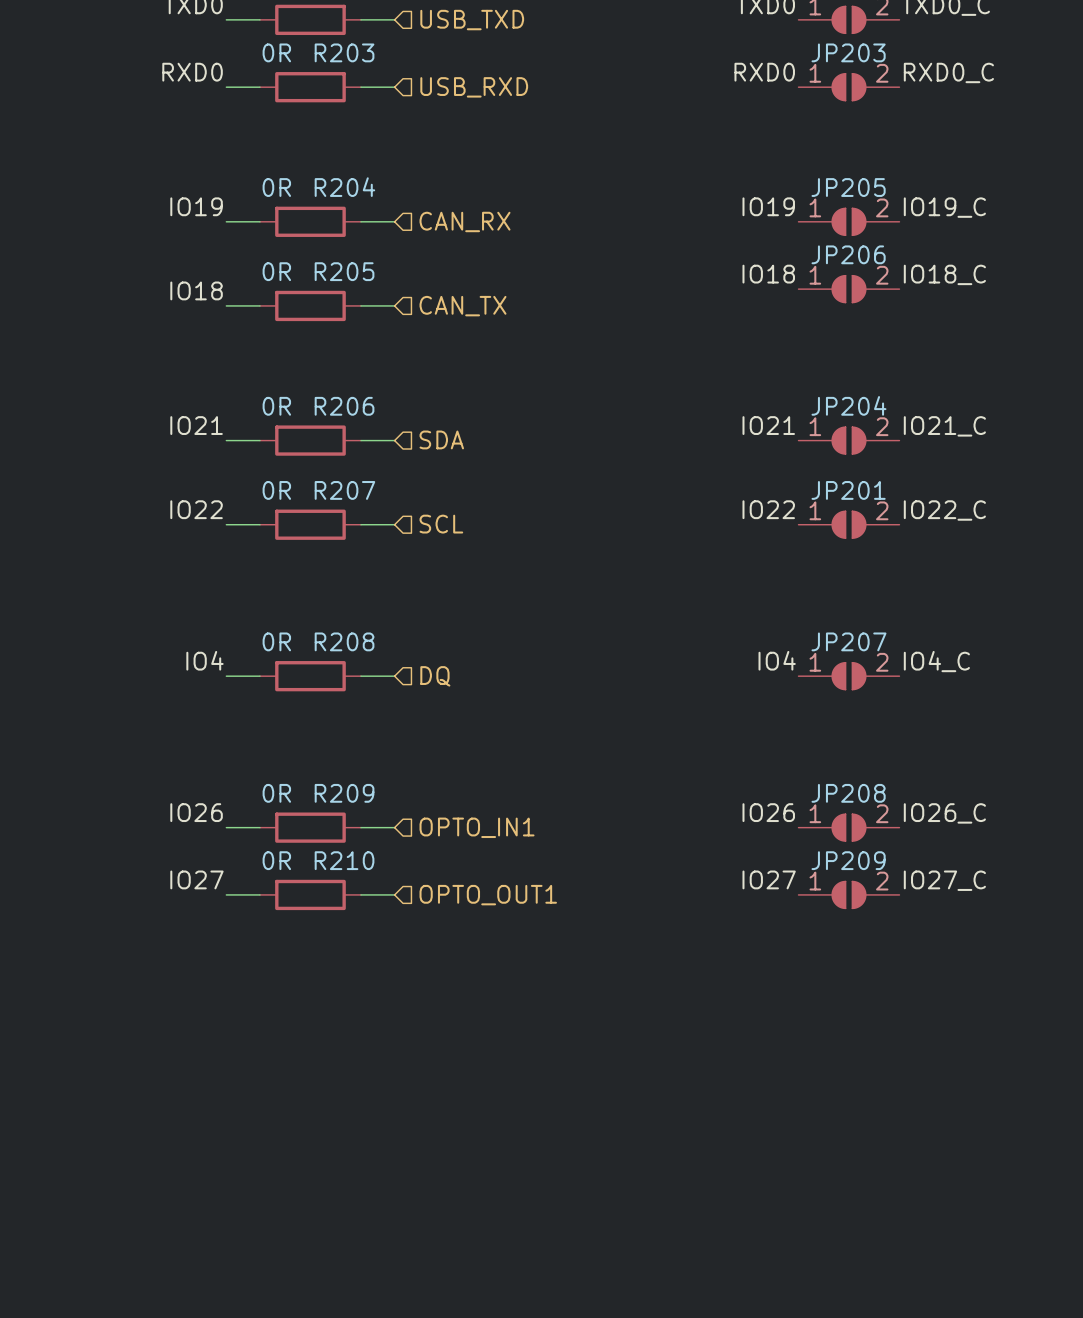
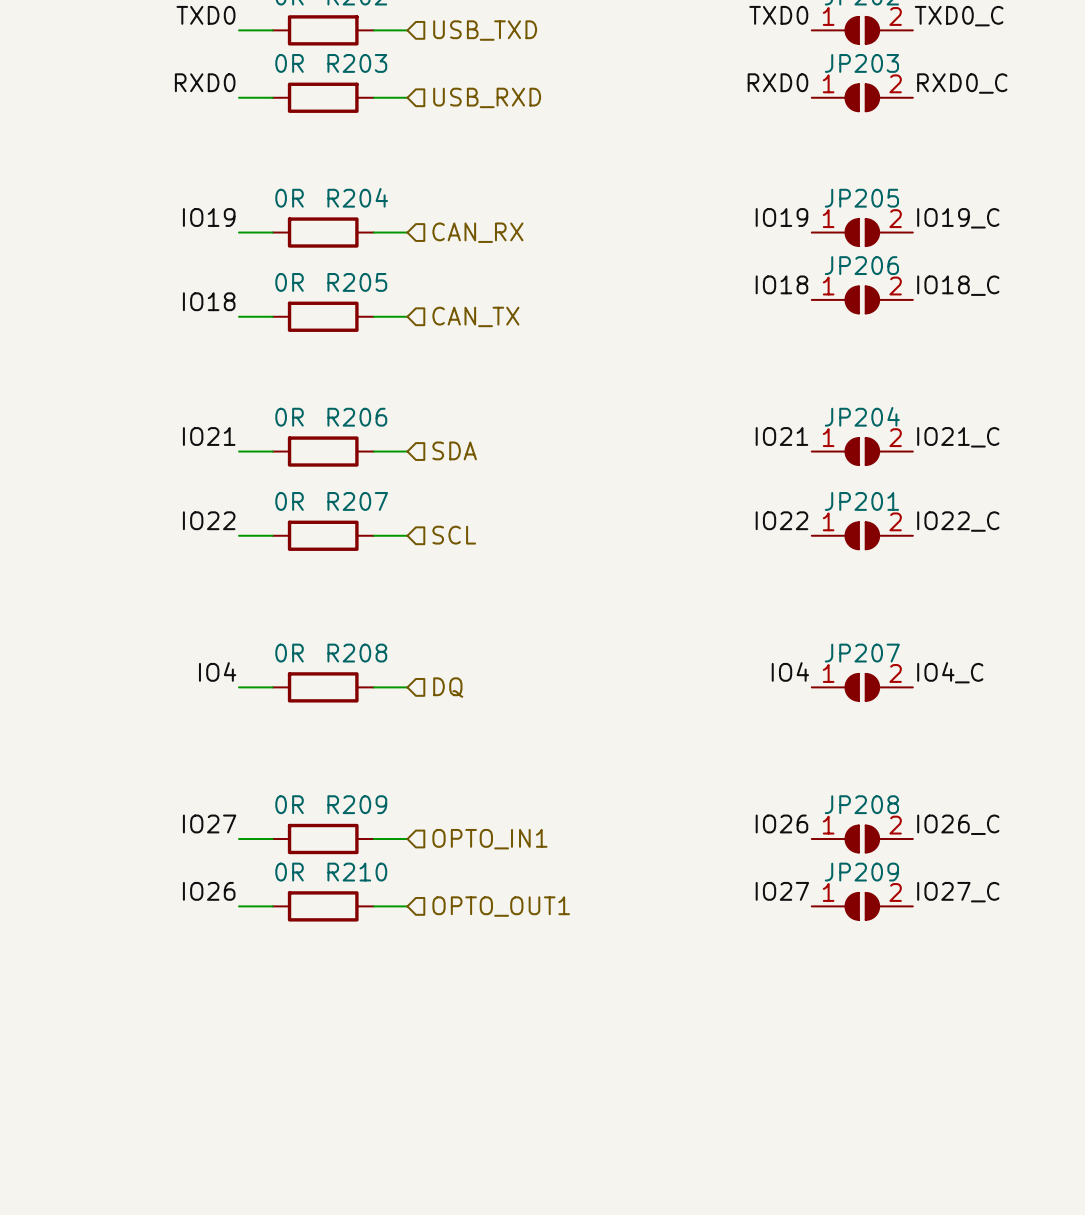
label: IO26 (196, 812) -> IO27 (209, 823)
label: IO27 (196, 879) -> IO26 (209, 891)

